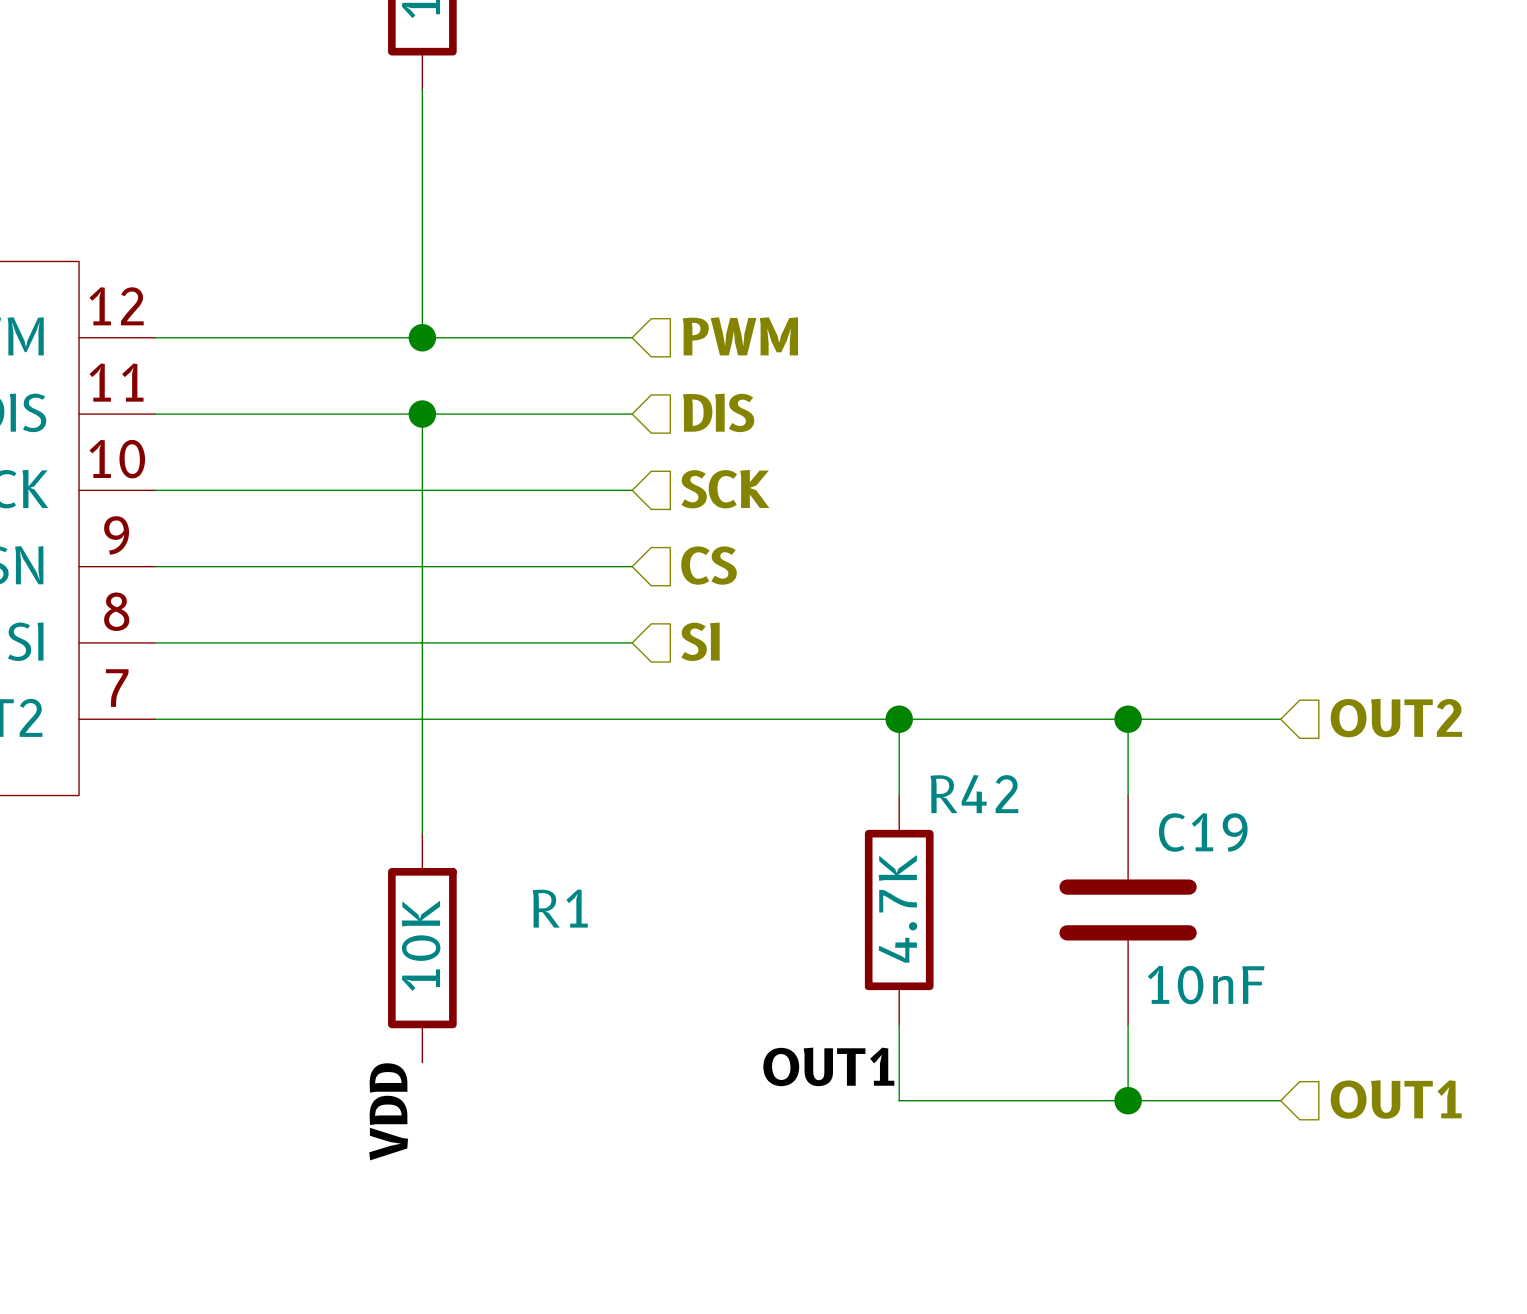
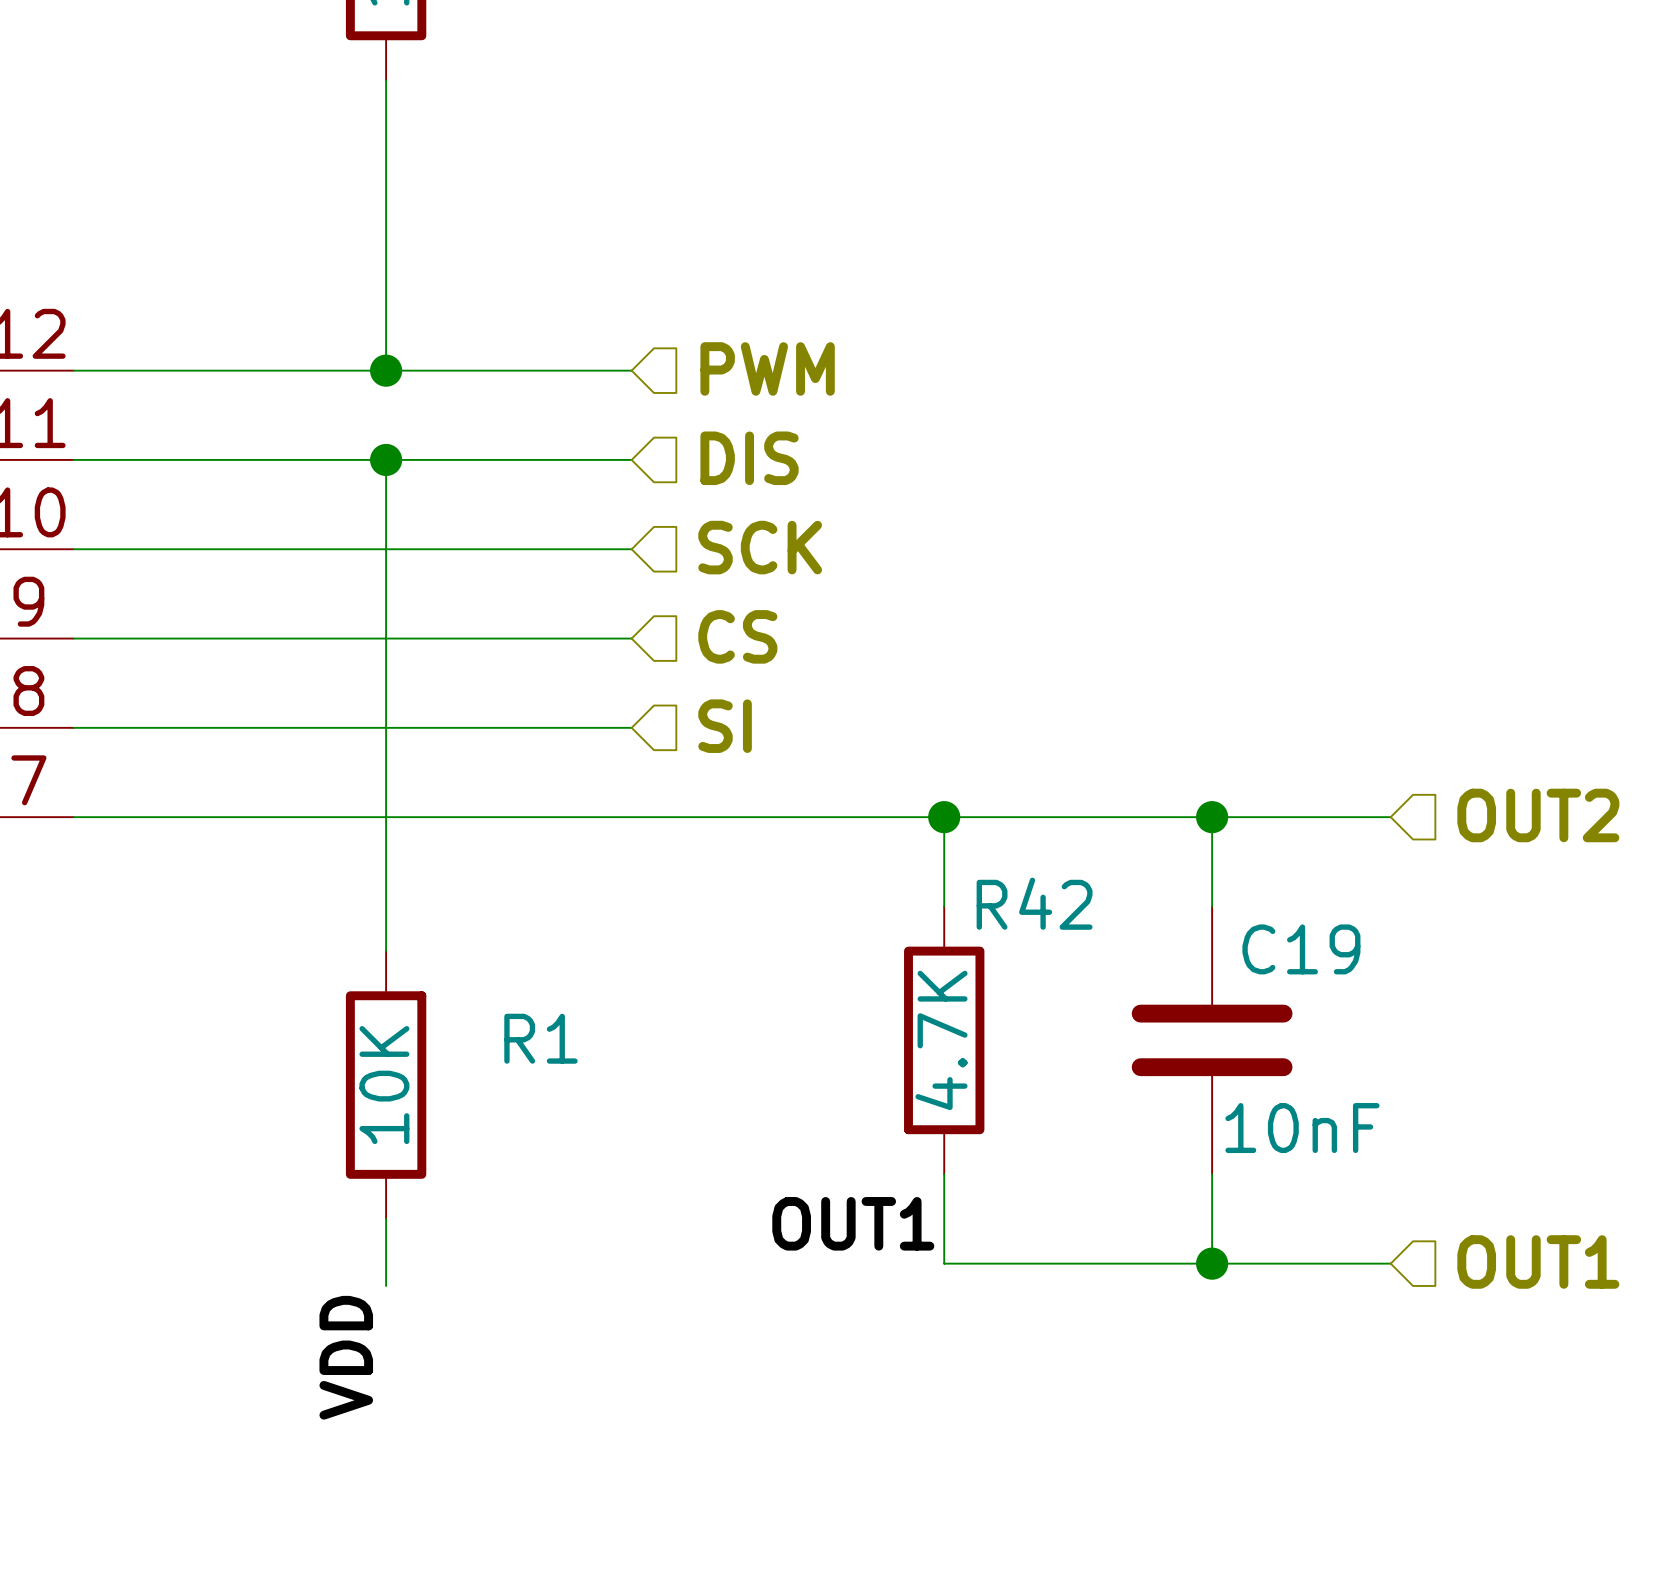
wire: none -> (386, 1219) (386, 1285)
label position: VDD (388, 1111) -> VDD (346, 1357)

